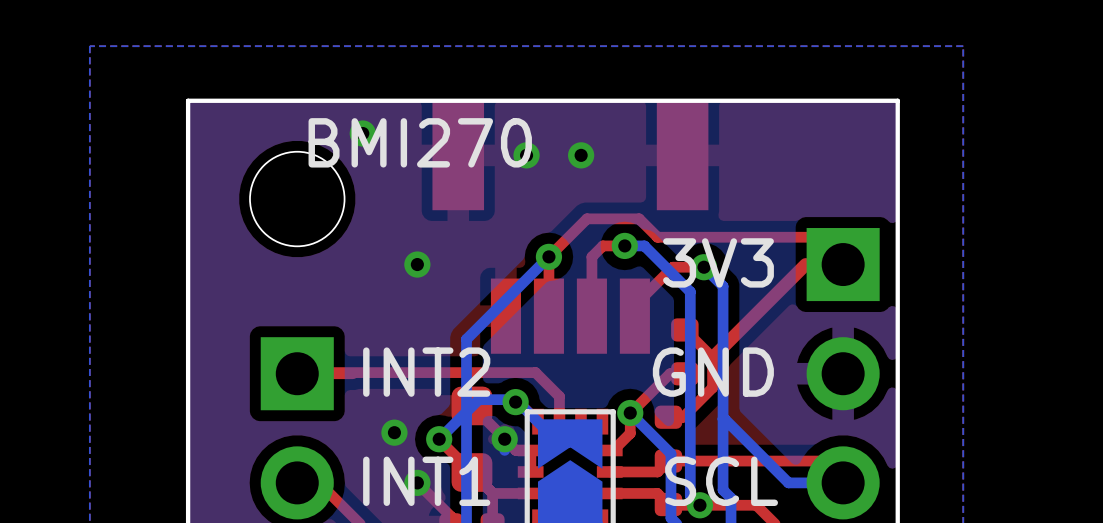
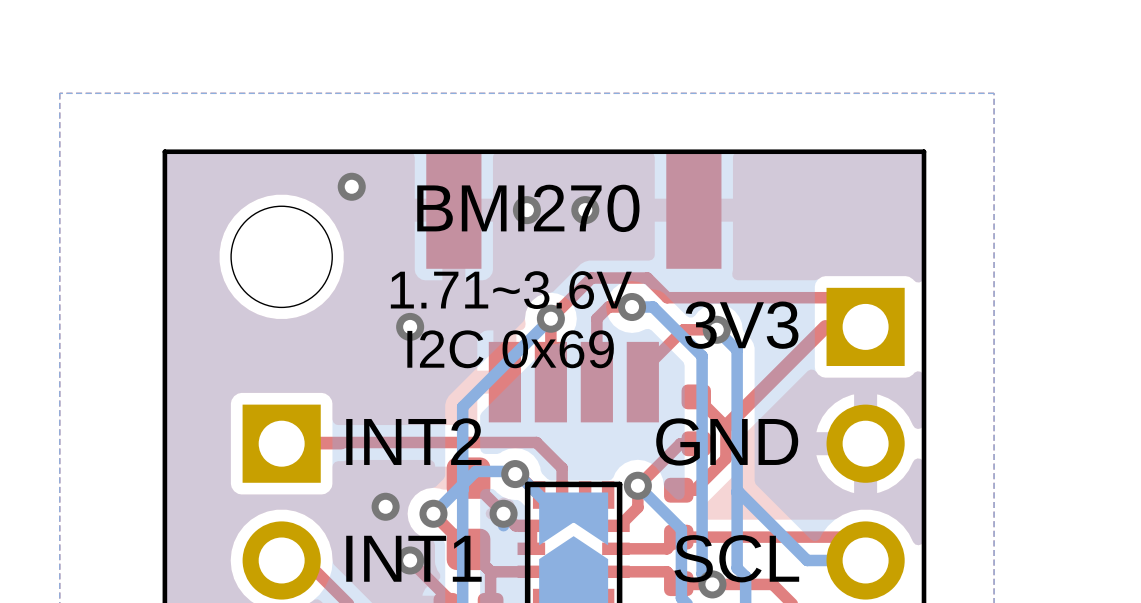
text position: BMI270 (420, 142) -> BMI270 (528, 208)
text: none -> 1.71~3.6V (511, 290)
text: none -> I2C 0x69 (510, 349)

